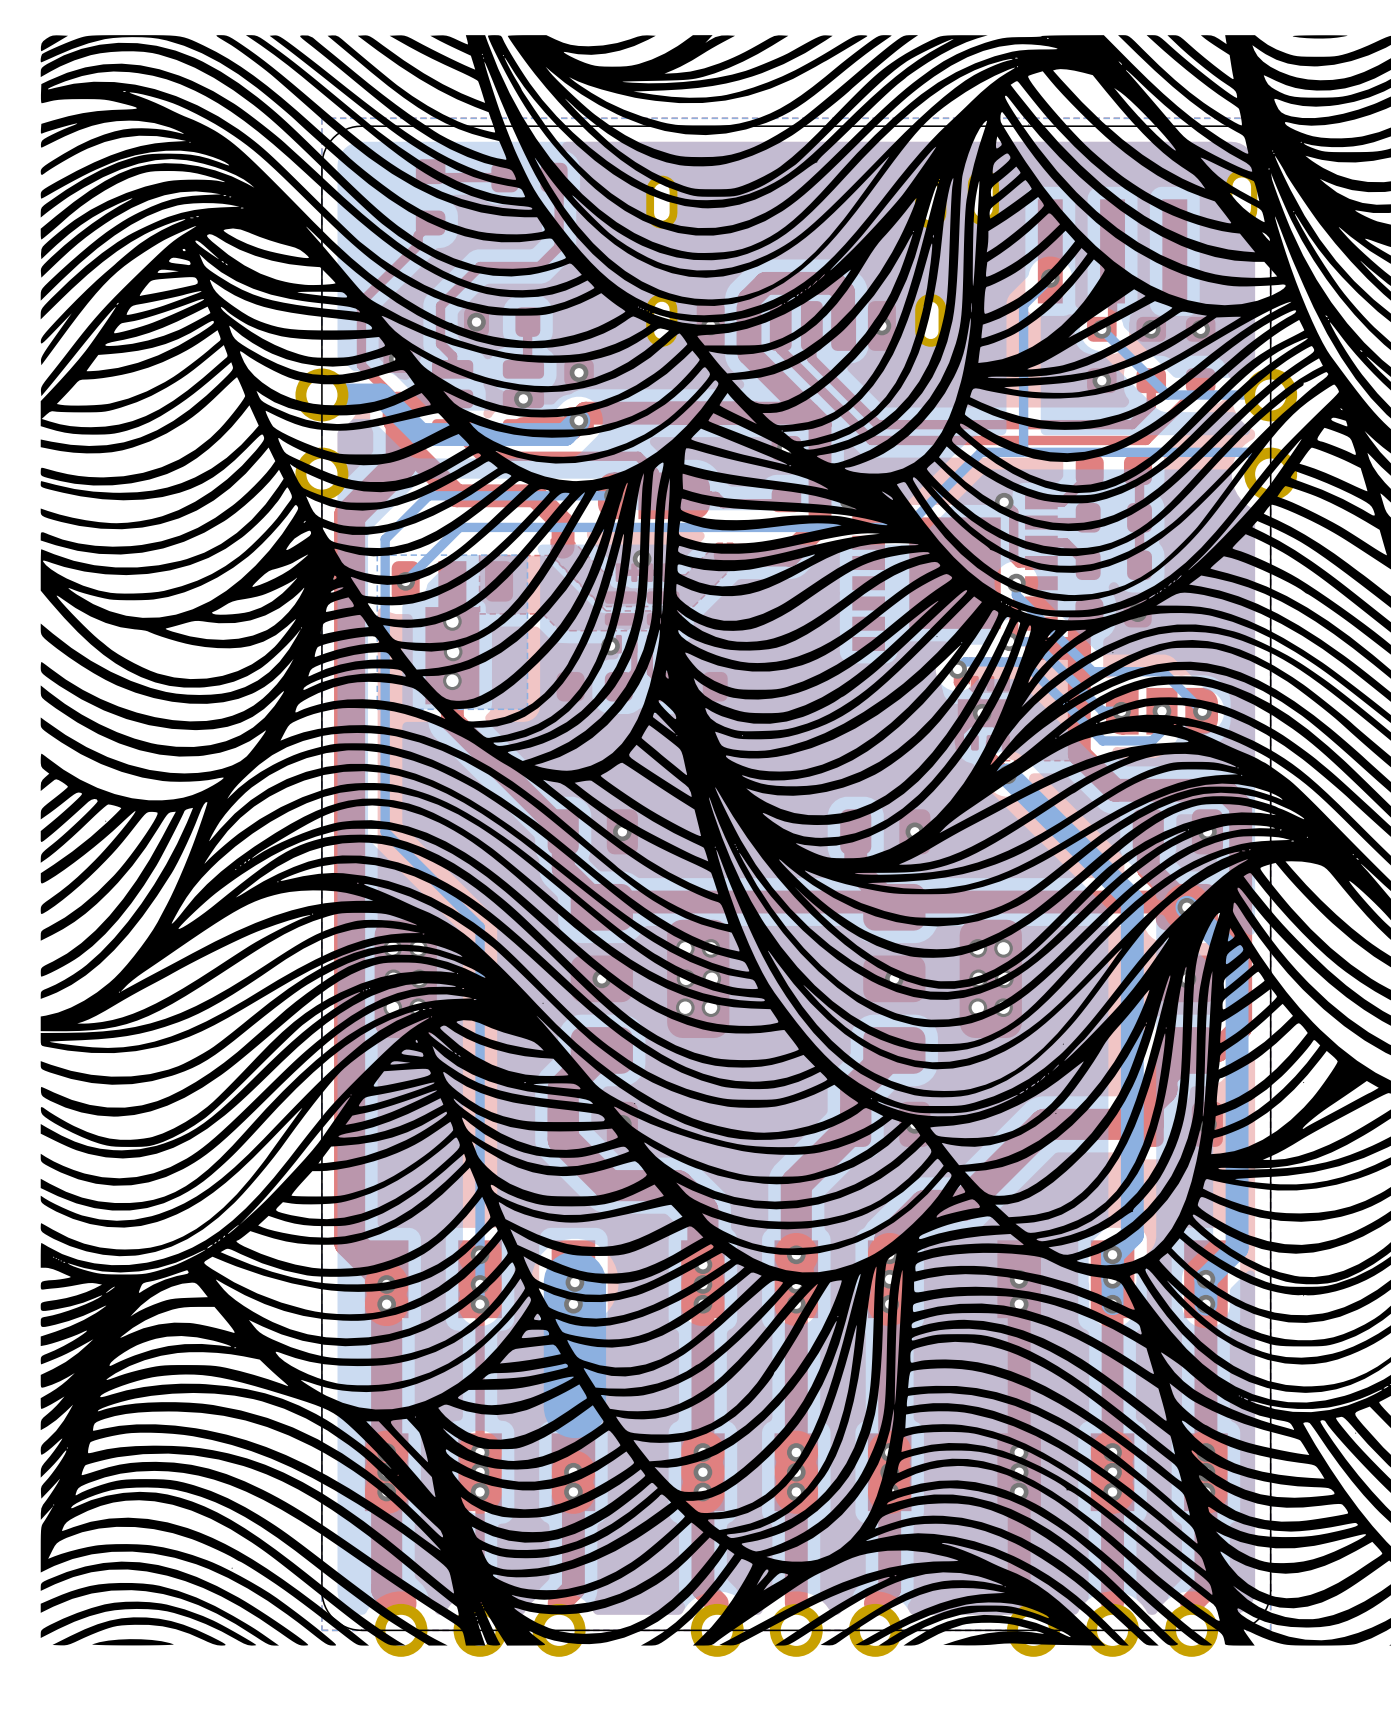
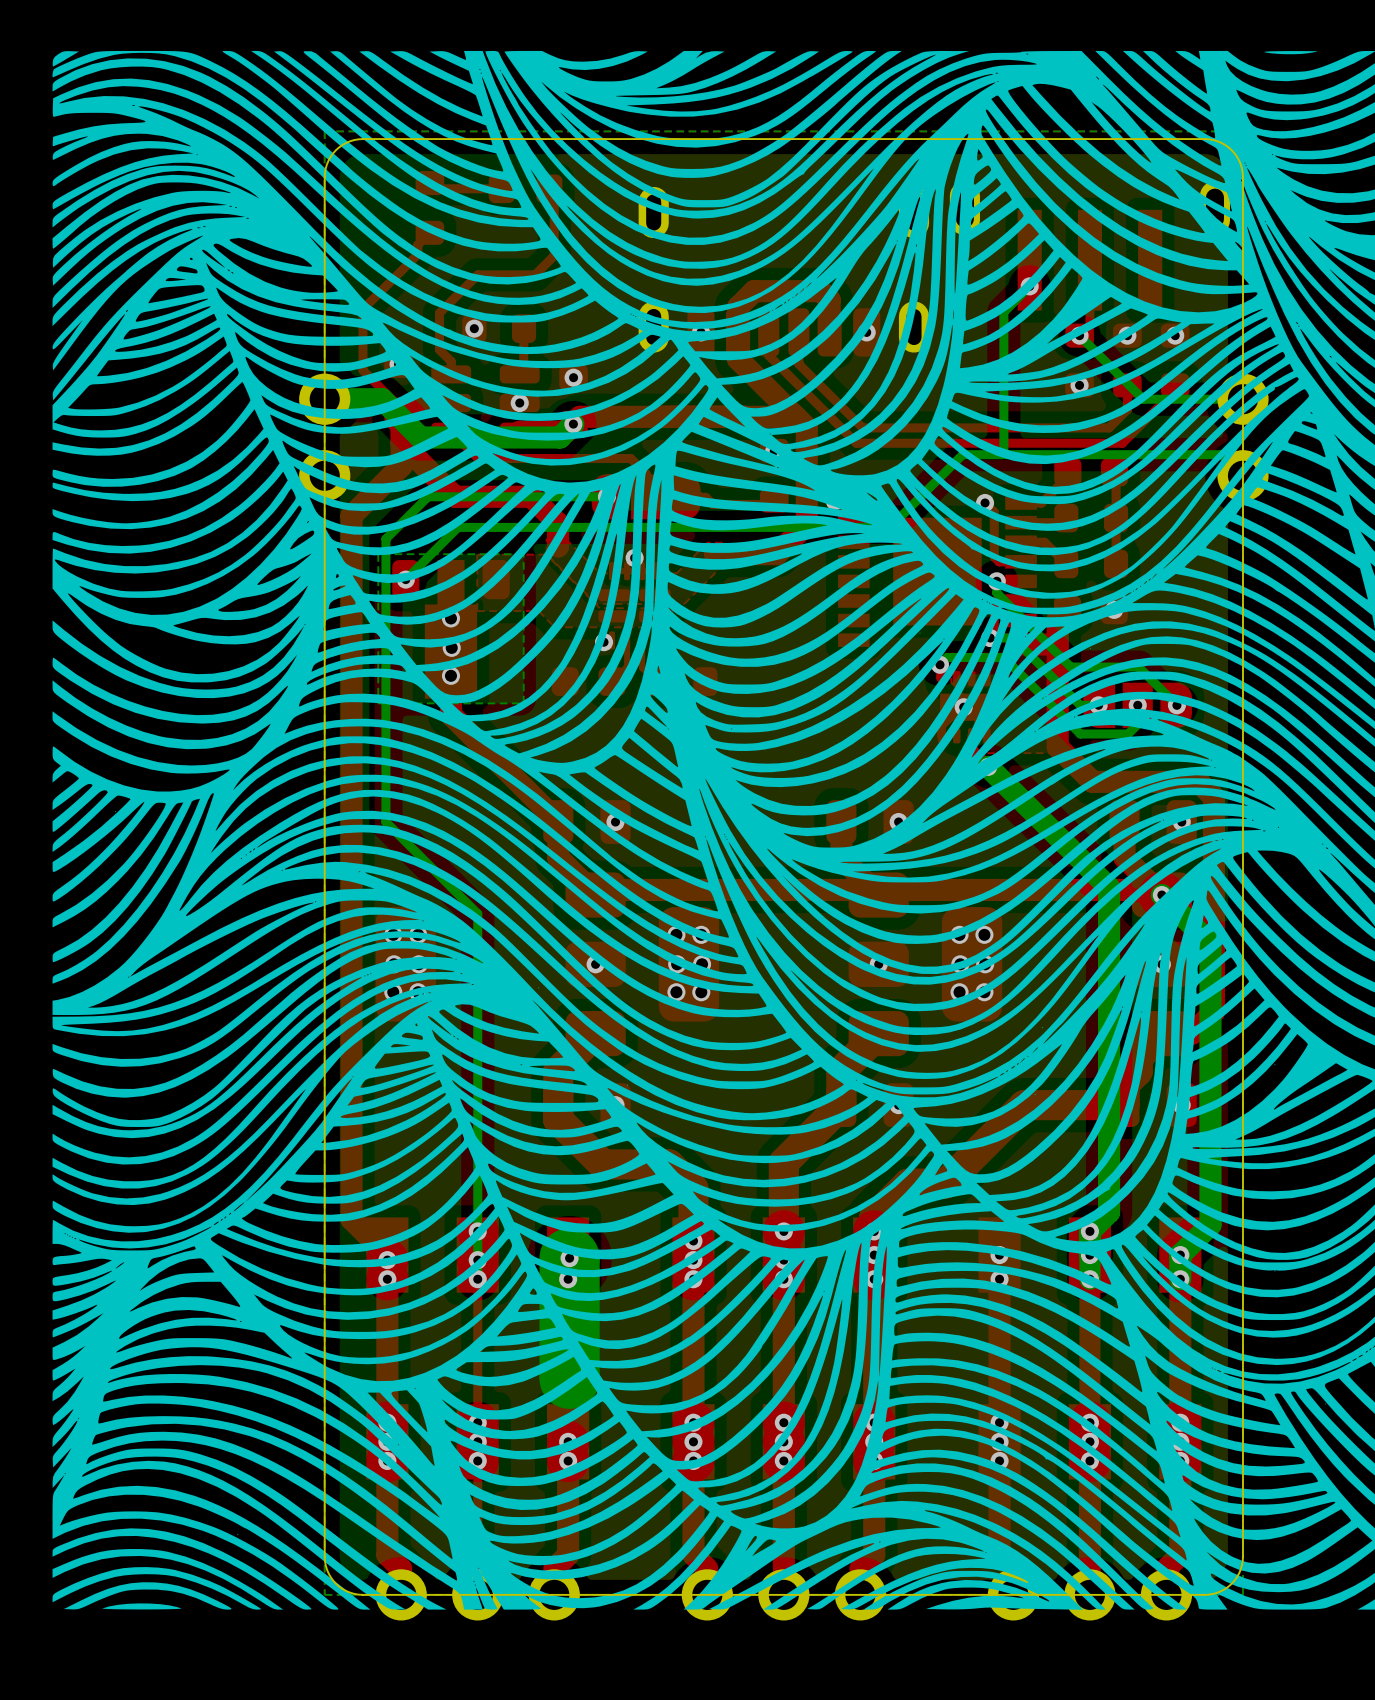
top track width: thick (398, 407) (398, 419) (401, 422) (401, 463) (349, 515) (349, 1242) (386, 1279) (386, 1589) (400, 1603) -> thin (398, 411) (398, 422) (401, 425) (401, 465) (351, 515) (351, 1219) (387, 1255) (387, 1554) (401, 1568)

